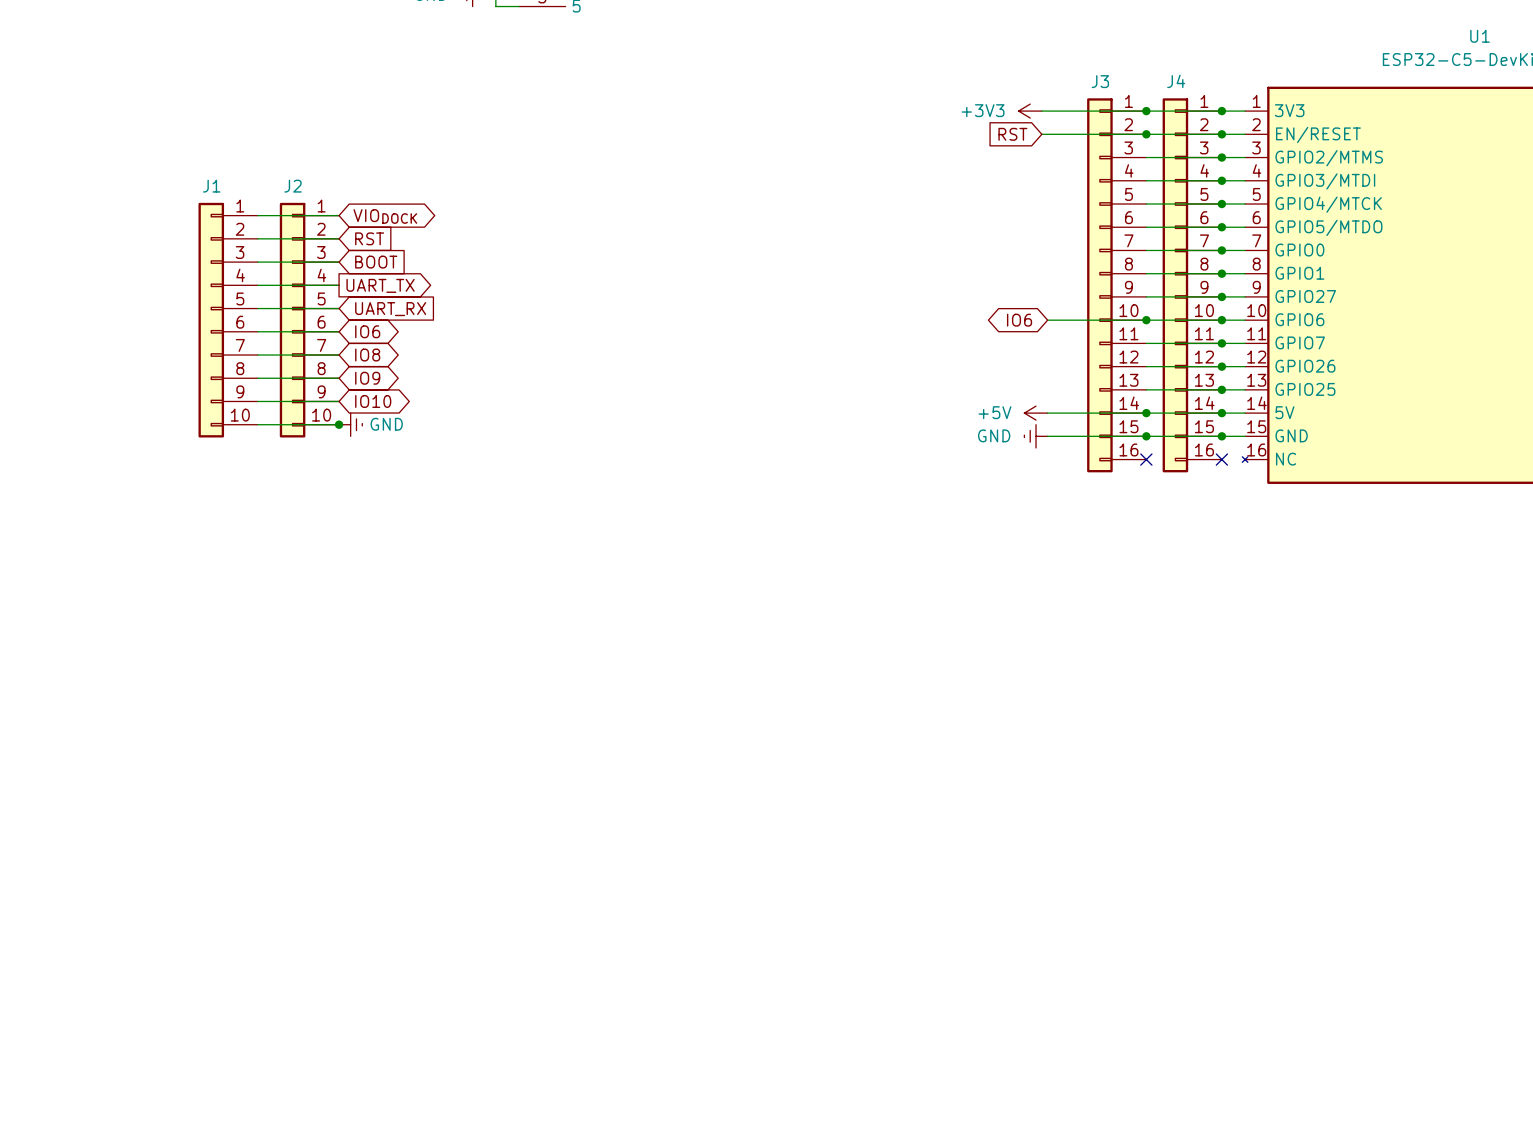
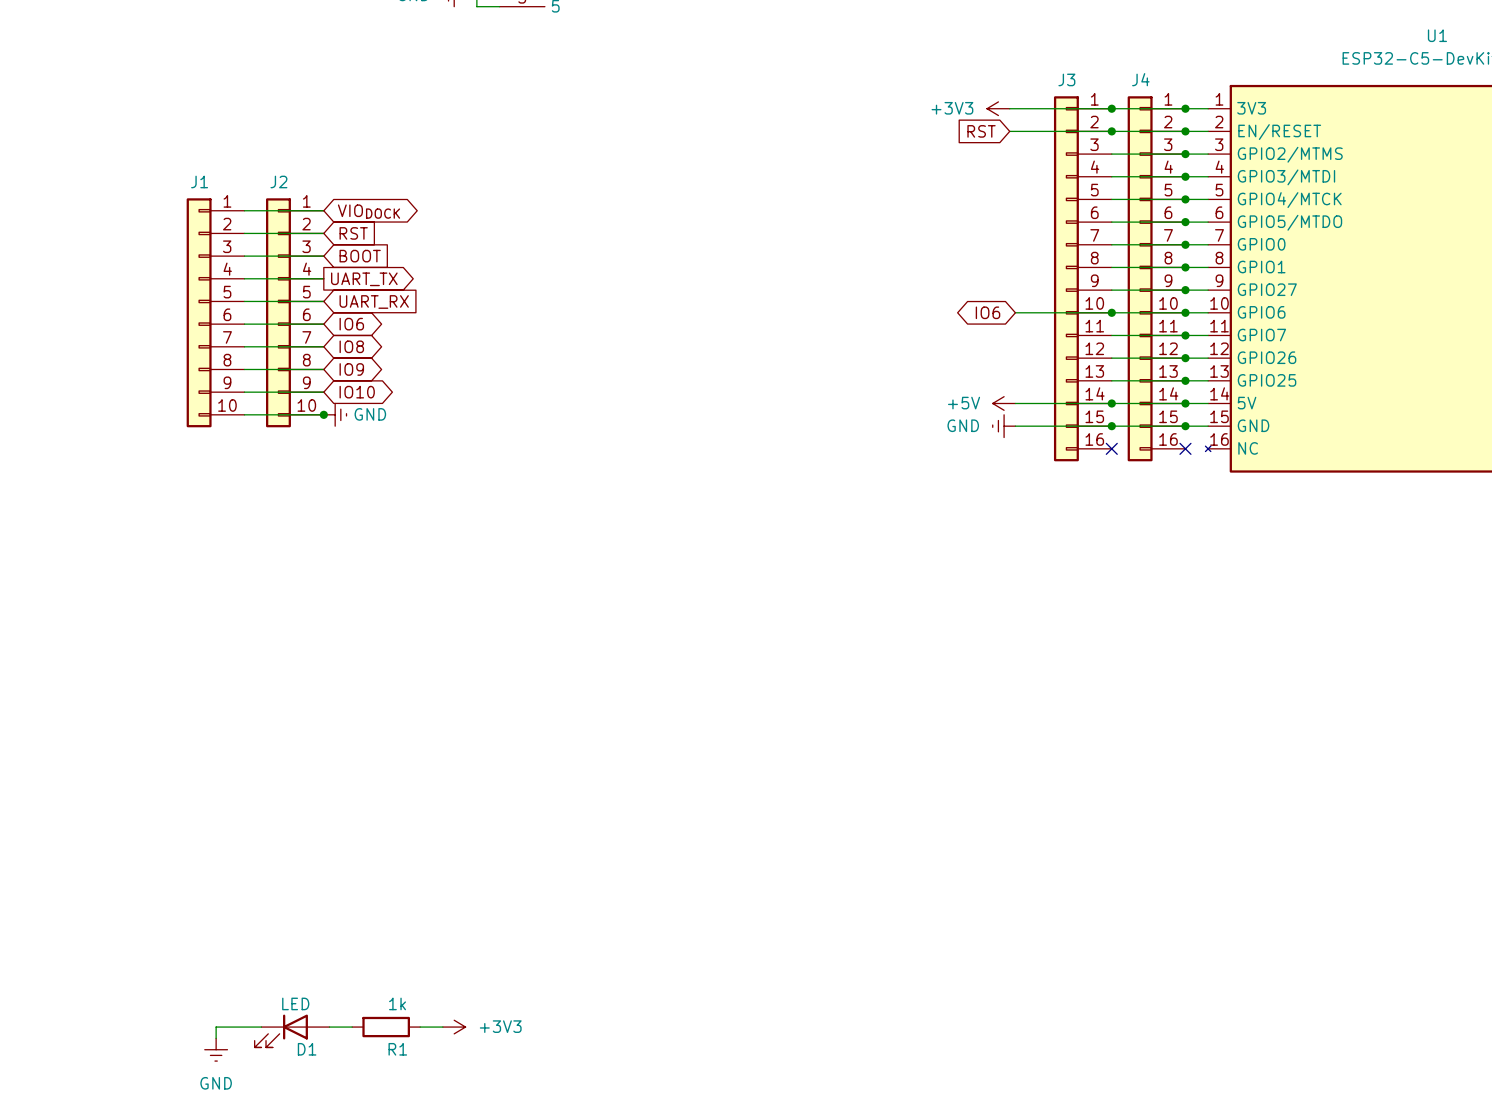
wire: none -> (261, 1027) (216, 1027) (216, 1038)
wire: none -> (329, 1027) (352, 1027)
R1: none -> 1k (386, 1027)
wire: none -> (420, 1027) (442, 1027)
power symbol: none -> +3V3 (454, 1027)
D1: none -> LED (292, 1031)
power symbol: none -> GND (216, 1049)

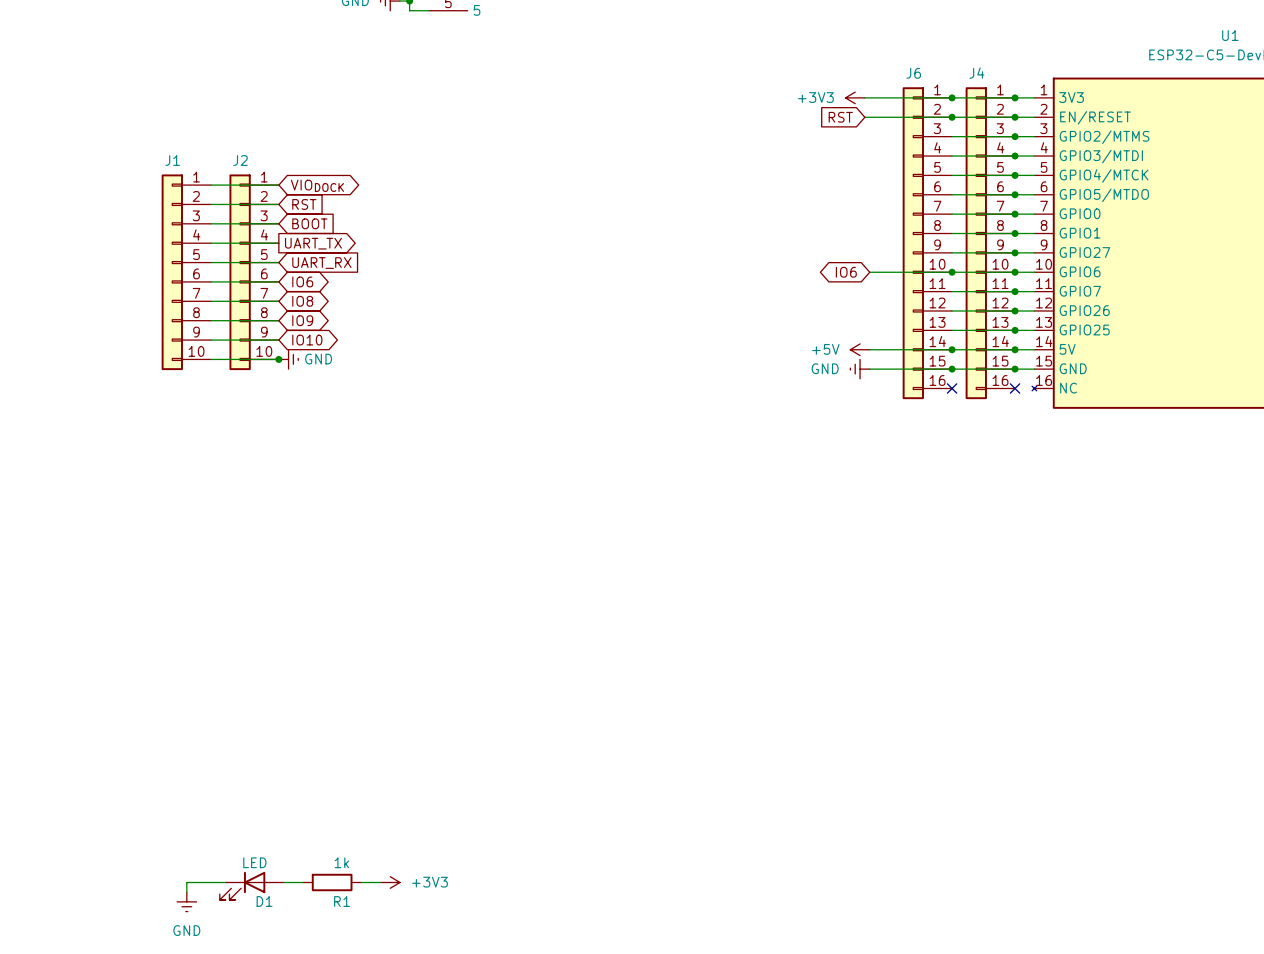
J3 name: J3 (1066, 79) -> J6 (913, 73)

